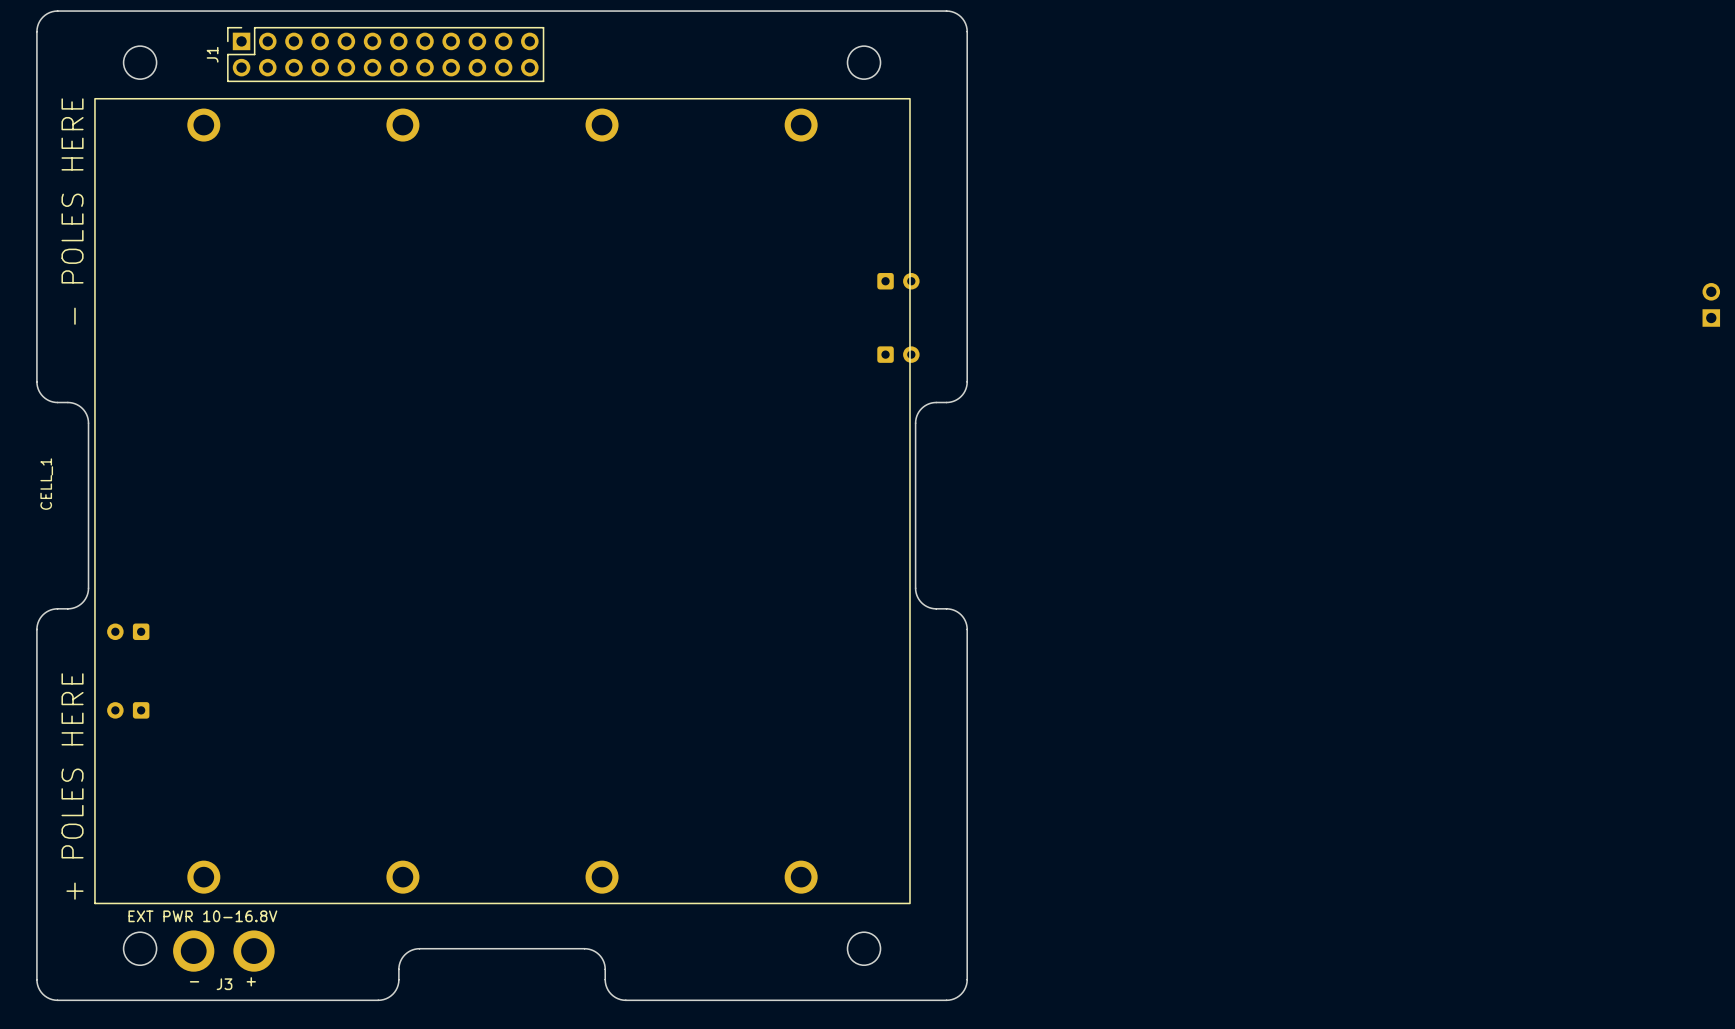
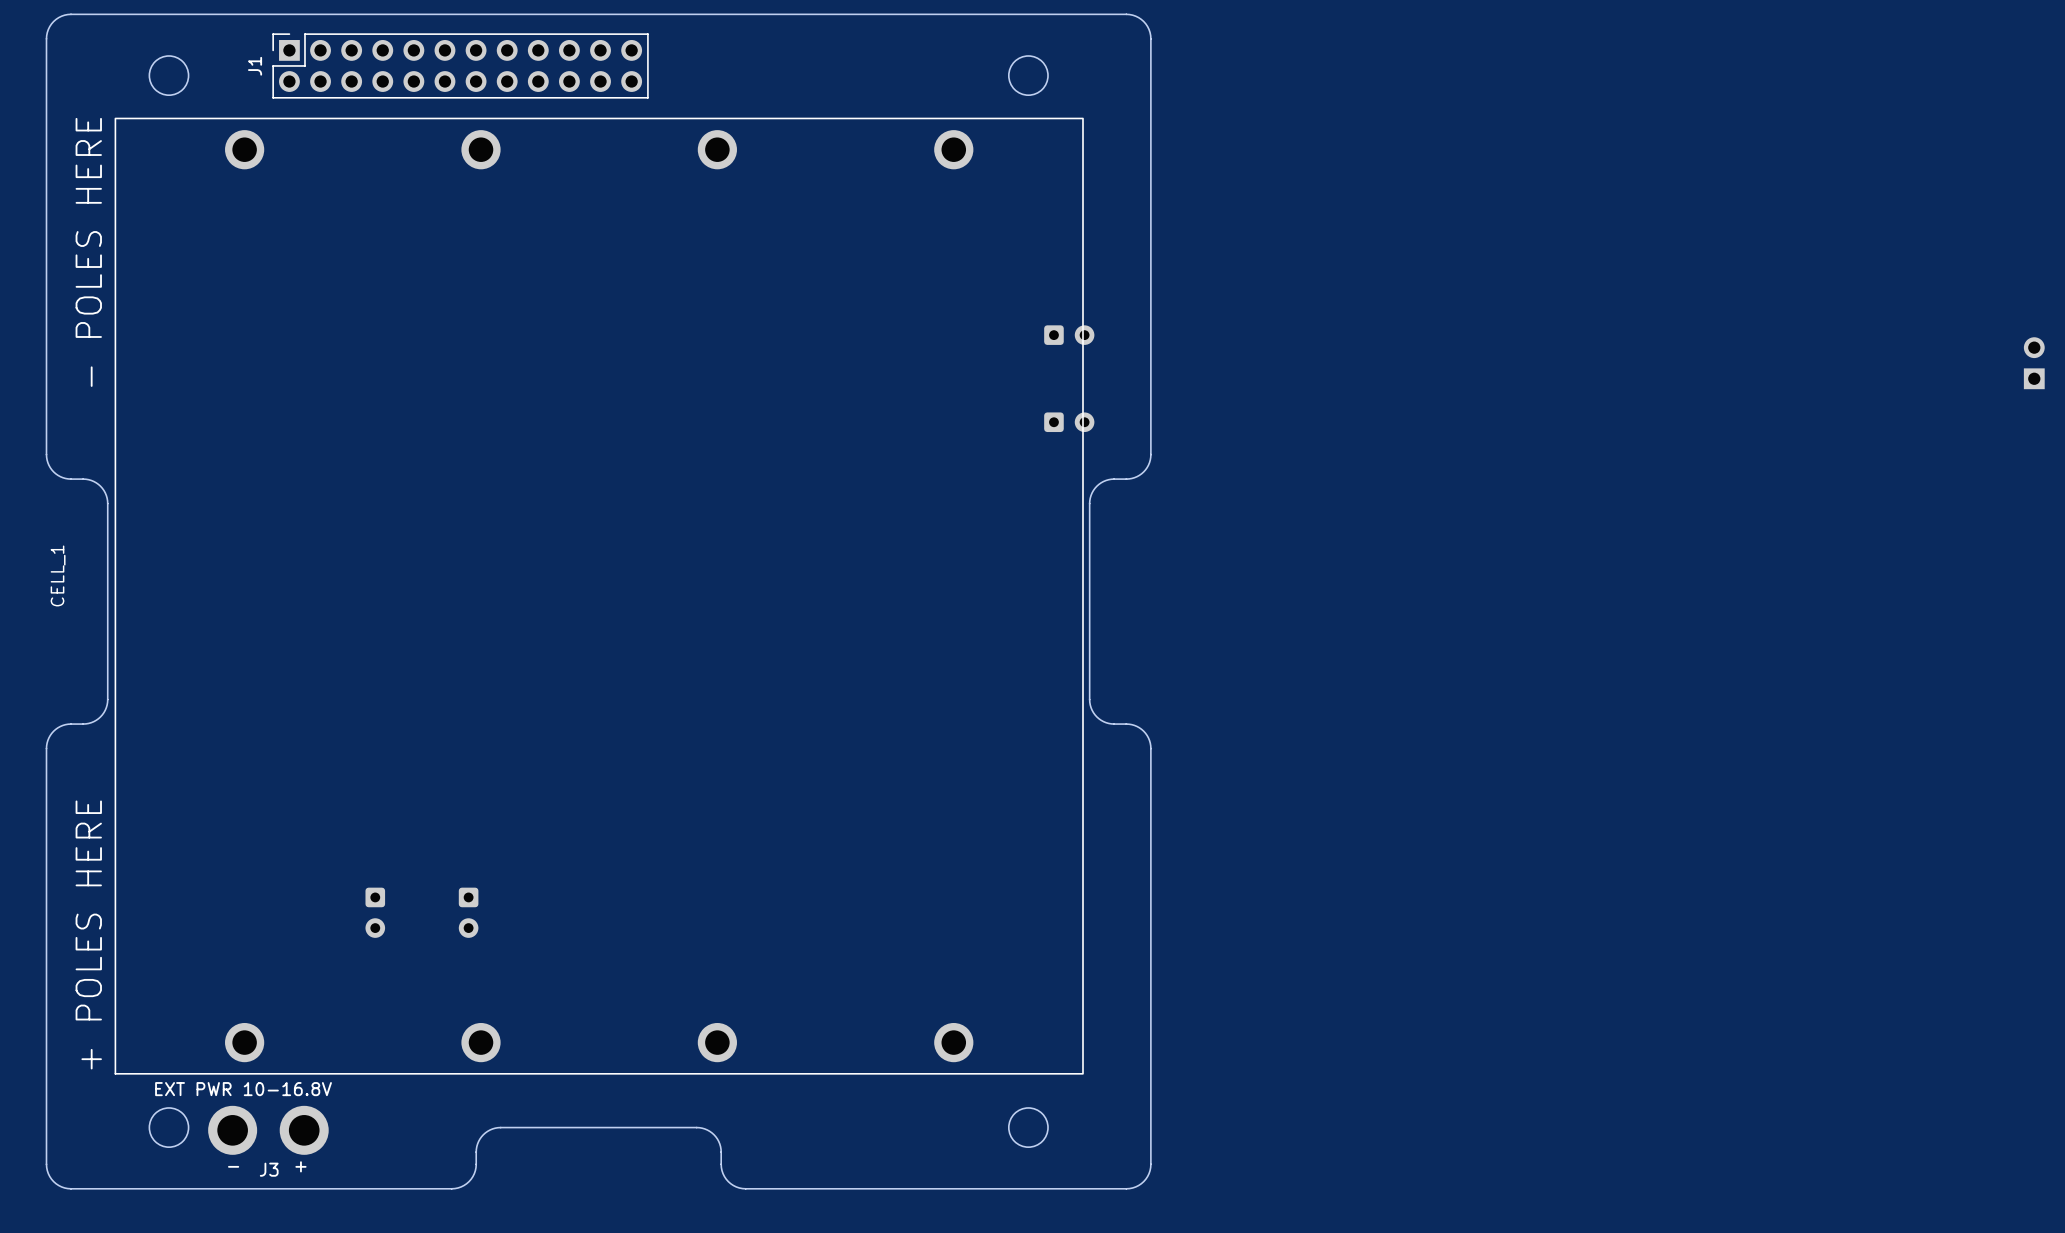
part: (128, 631) -> none
part: (128, 710) -> none
part: none -> (375, 912)
part: none -> (468, 912)

